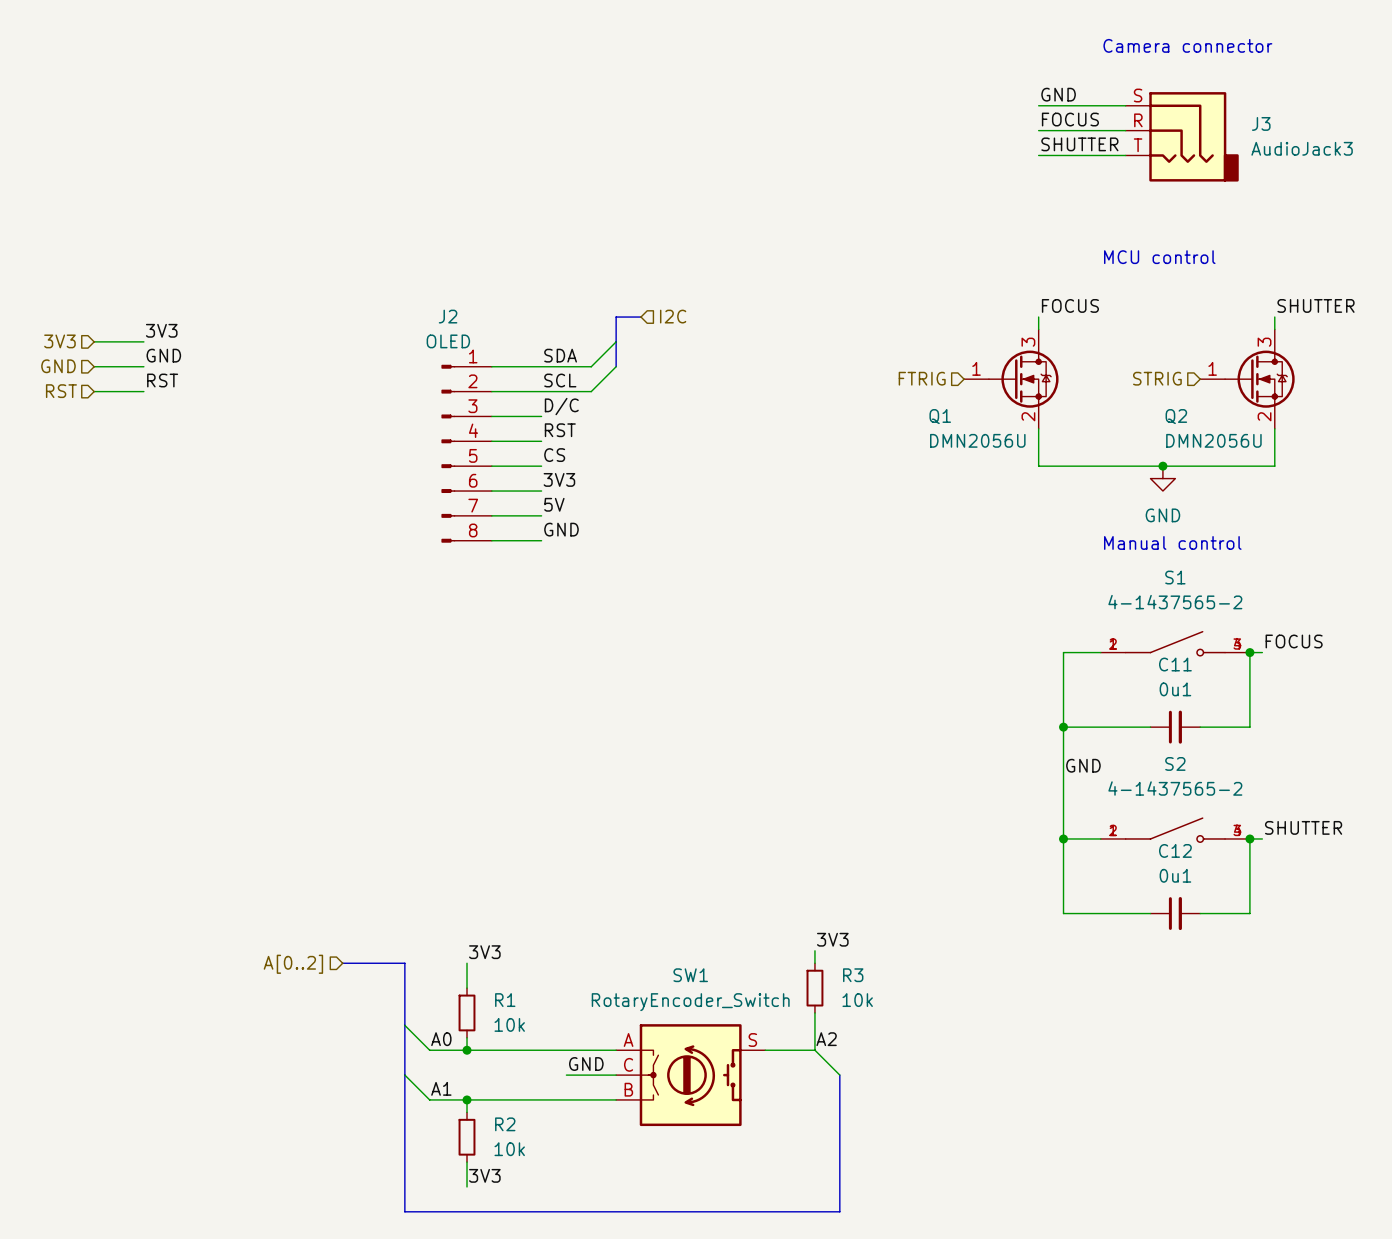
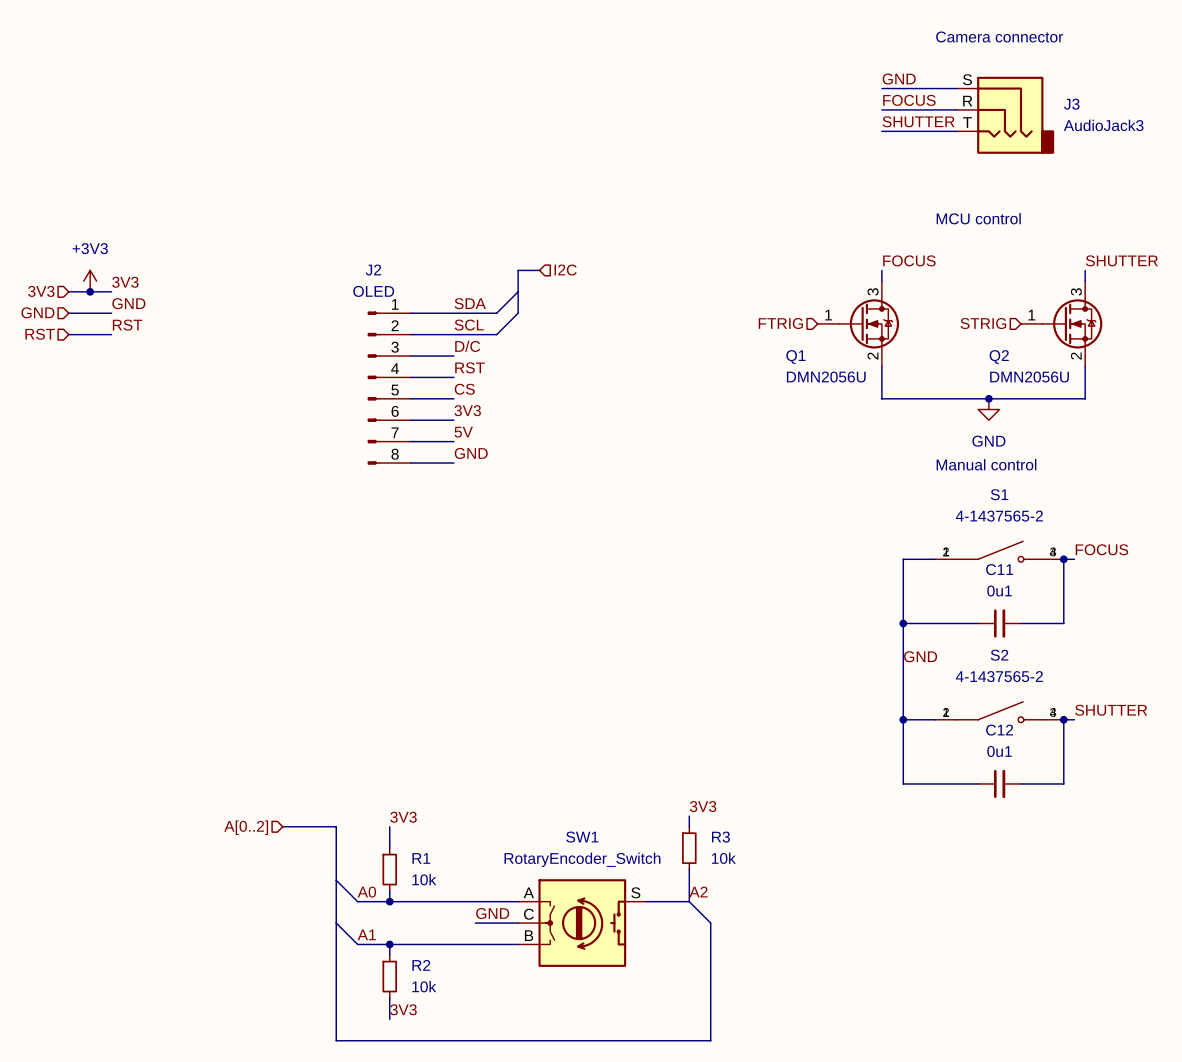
power symbol: none -> +3V3 (90, 281)
junction: none -> (90, 291)

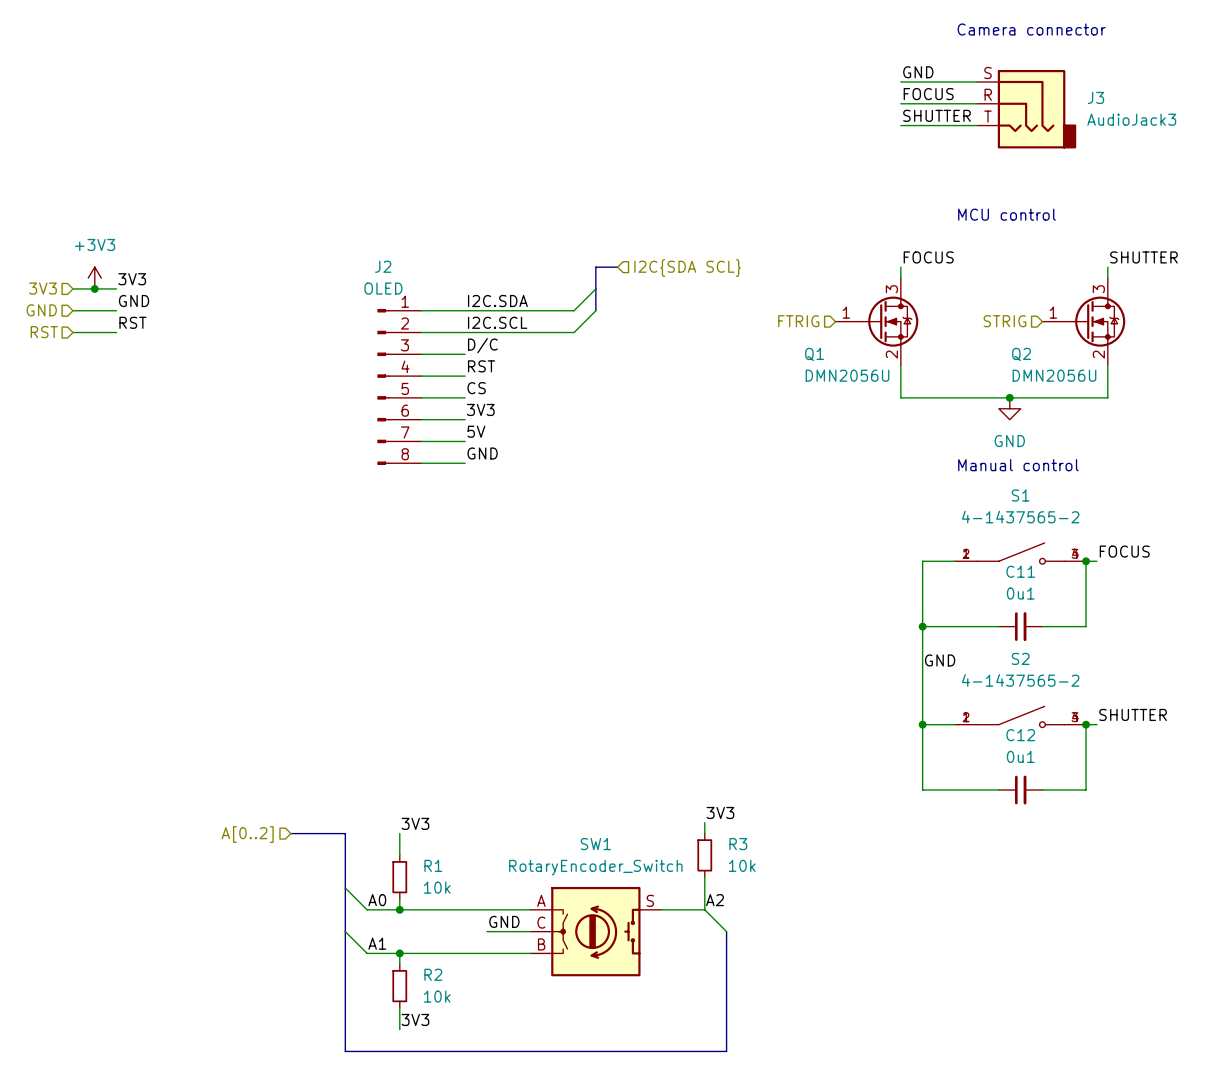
bus: (539, 270) (518, 270) (518, 313) -> (617, 267) (595, 267) (595, 310)
hierarchical label: I2C (565, 270) -> none
hierarchical label: none -> I2C{SDA SCL} (687, 268)
wire: (518, 291) (496, 313) -> (595, 288) (574, 310) (508, 310)
label: SDA (470, 303) -> I2C.SDA (497, 301)
wire: (518, 313) (496, 334) -> (595, 310) (574, 332) (508, 332)
label: SCL (469, 325) -> I2C.SCL (497, 322)

